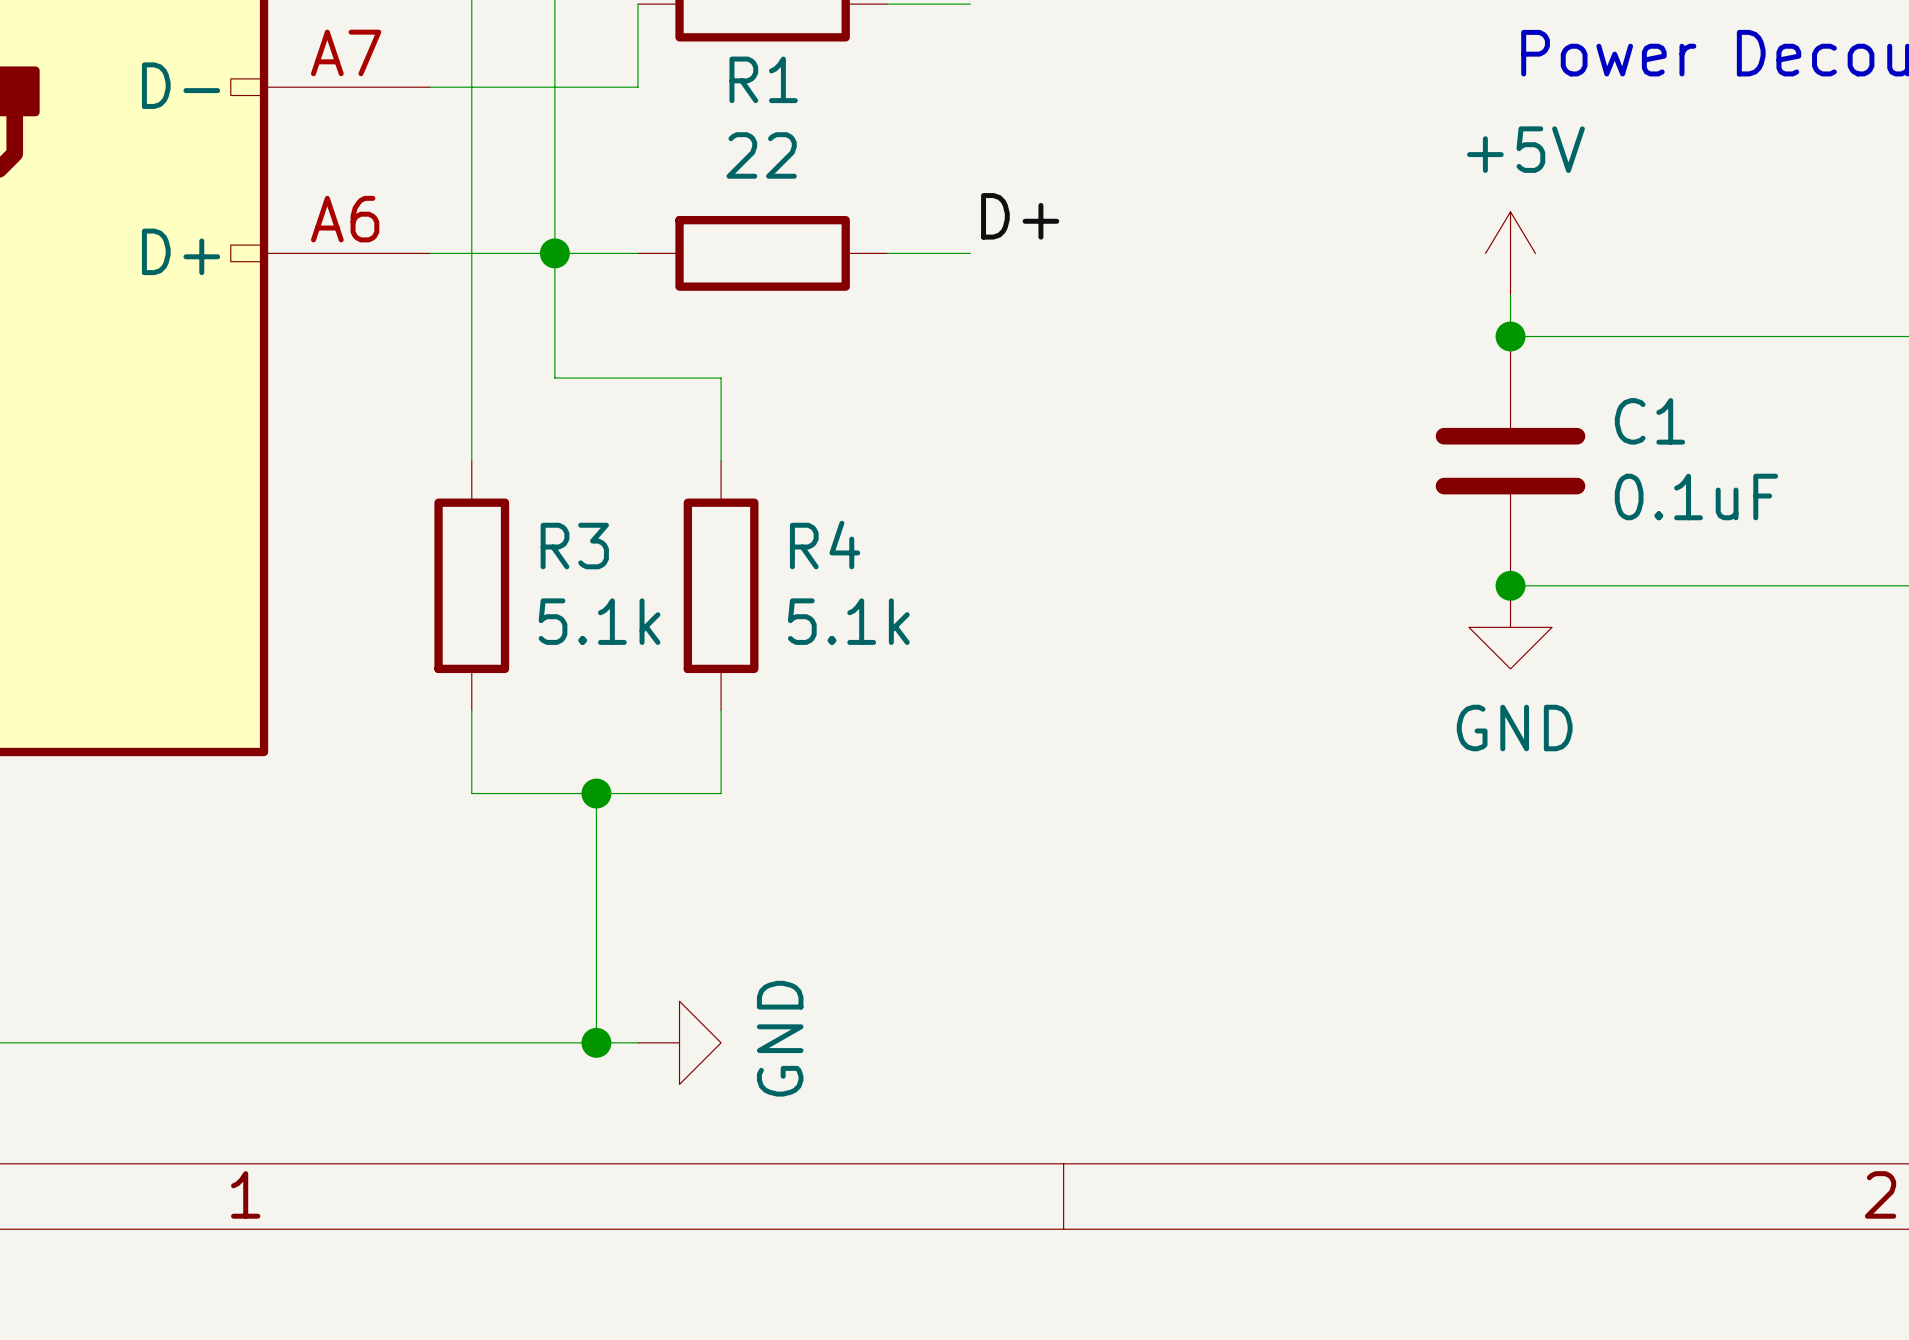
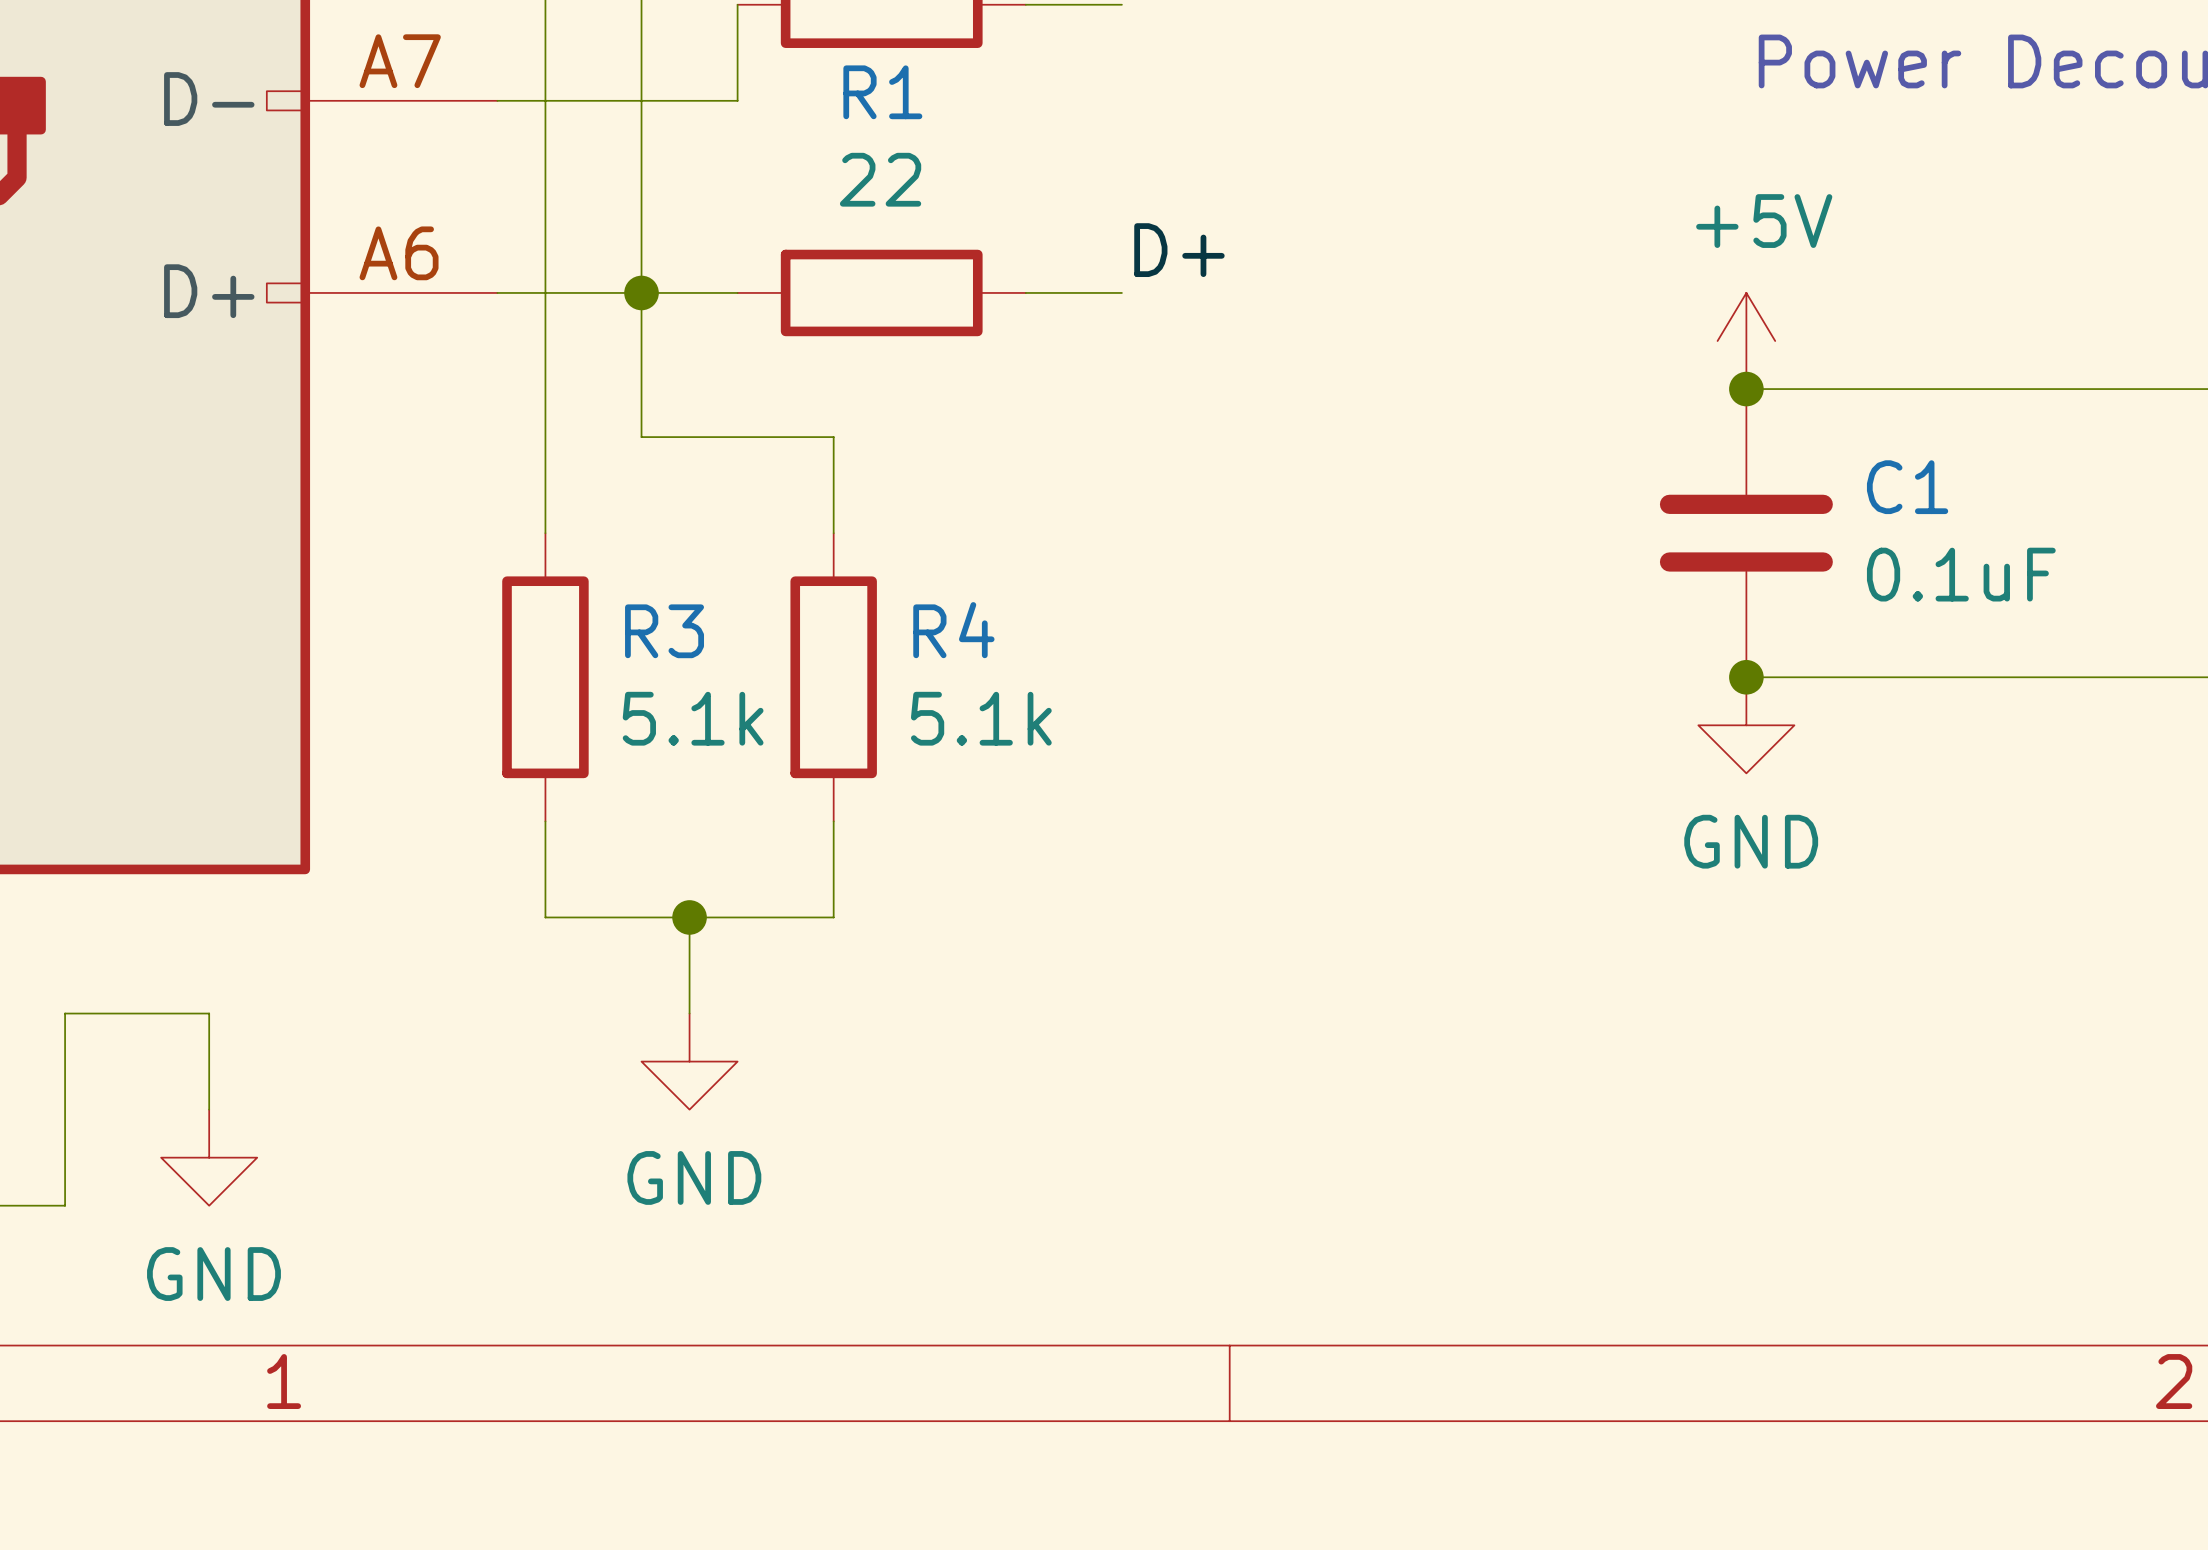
power symbol position: +5V (1510, 253) -> +5V (1746, 341)
wire: (596, 876) (596, 1042) -> none
power symbol: none -> GND (209, 1157)
wire: (56, 1042) (637, 1042) -> (65, 1205) (65, 1013) (209, 1013) (209, 1109)
junction: (596, 1042) -> none
power symbol rotation: 0° (679, 1042) -> 90° clockwise (689, 1061)
power symbol position: GND (679, 1042) -> GND (689, 1061)

